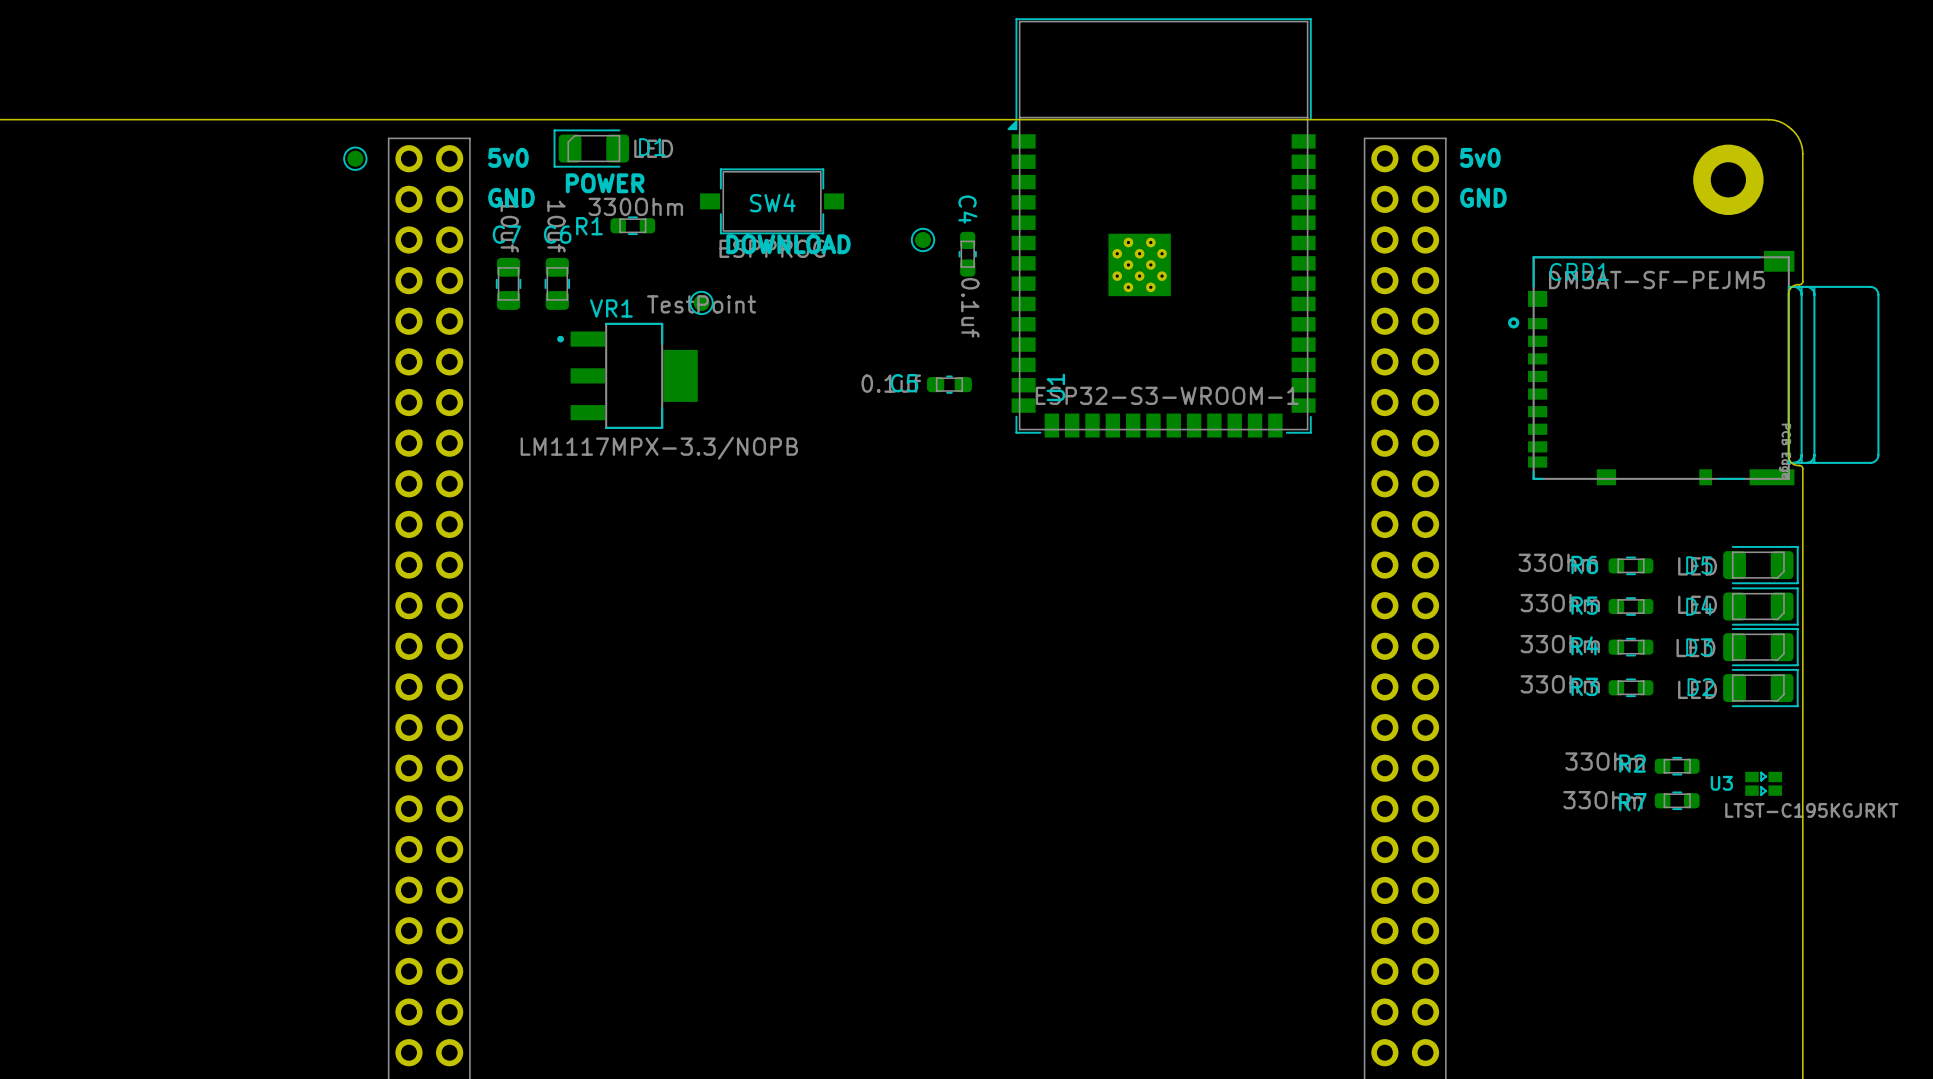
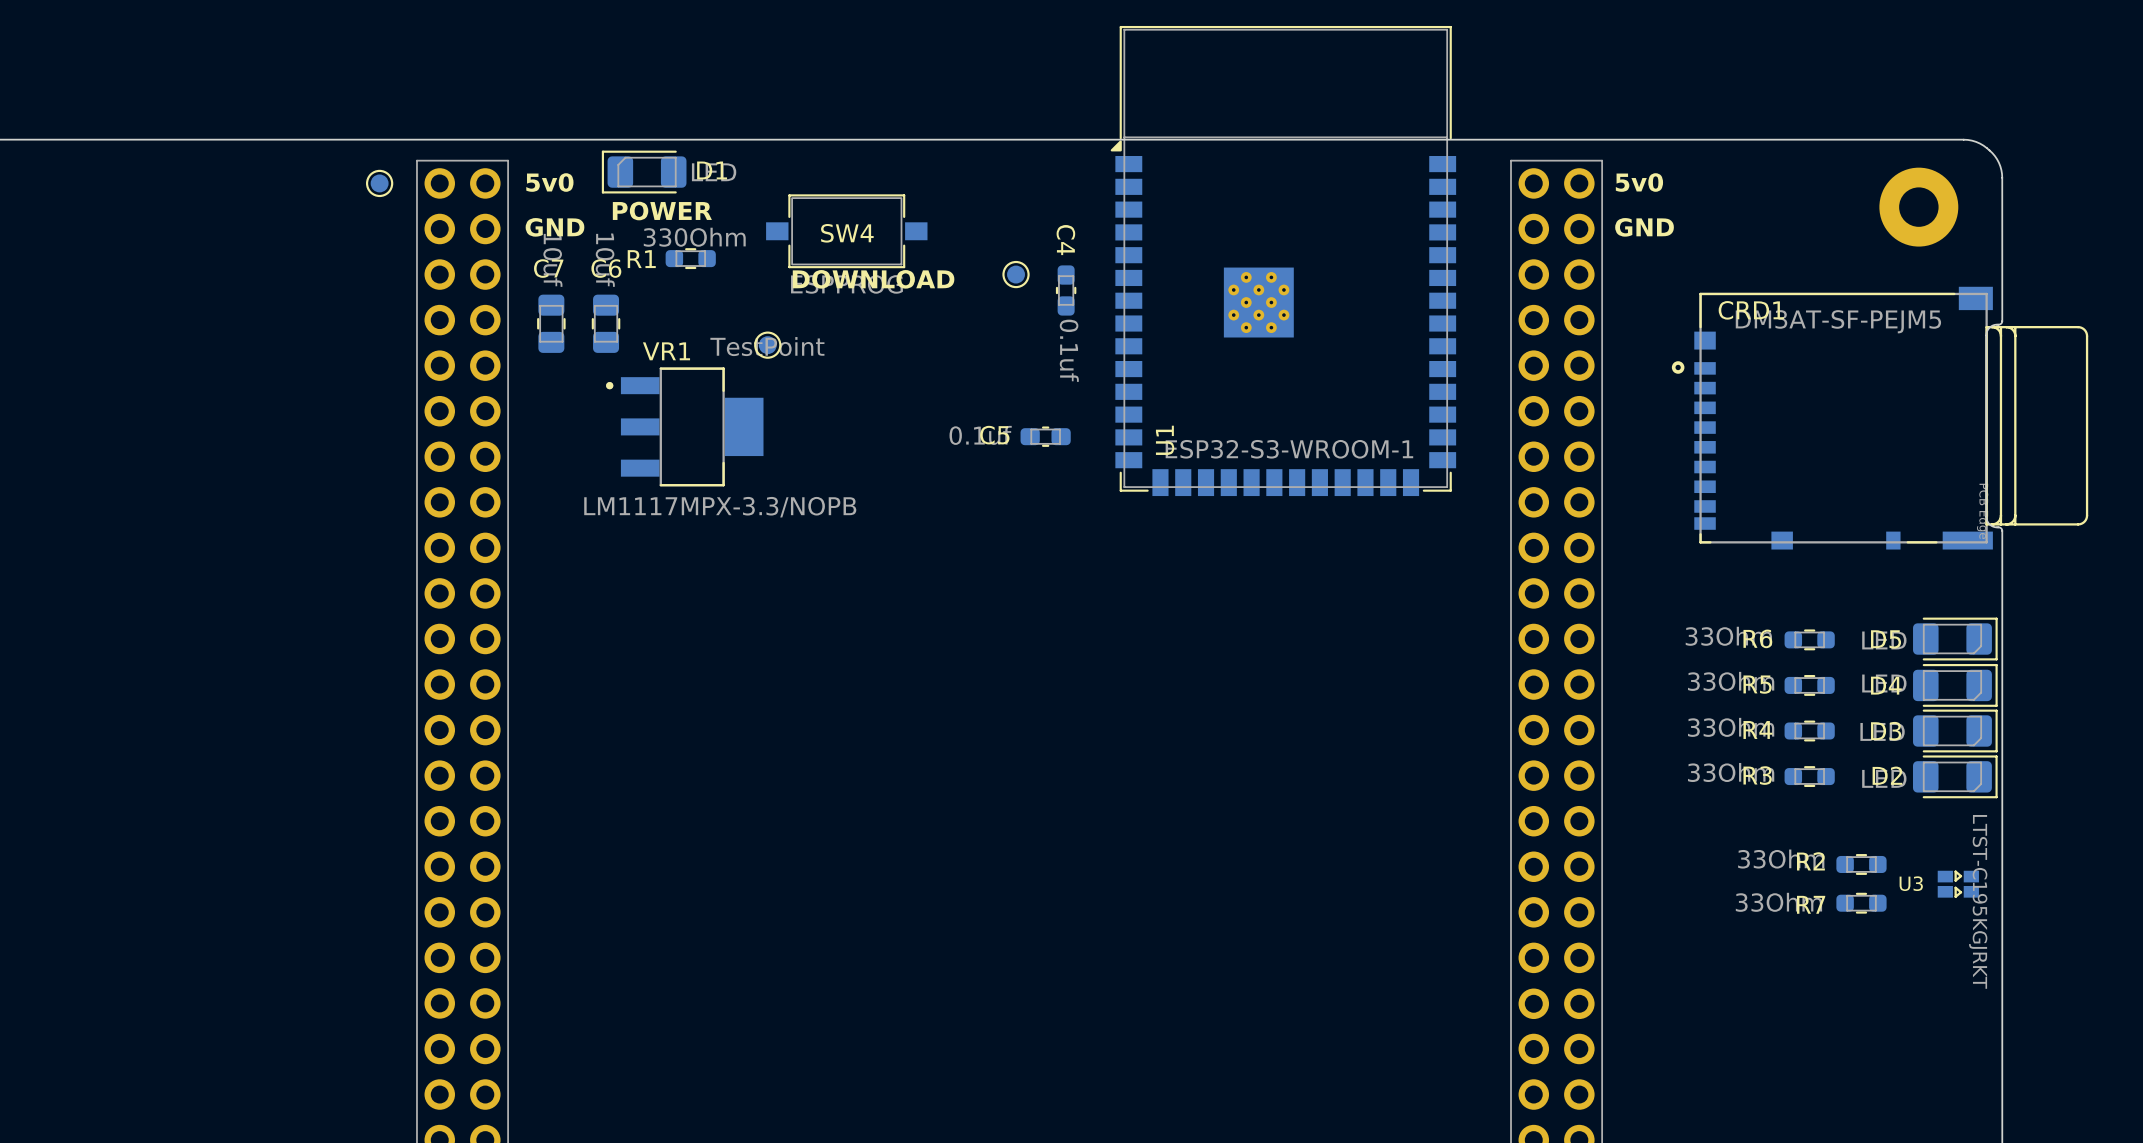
U3 value rotation: 0° (1811, 810) -> 90° clockwise (1978, 901)

